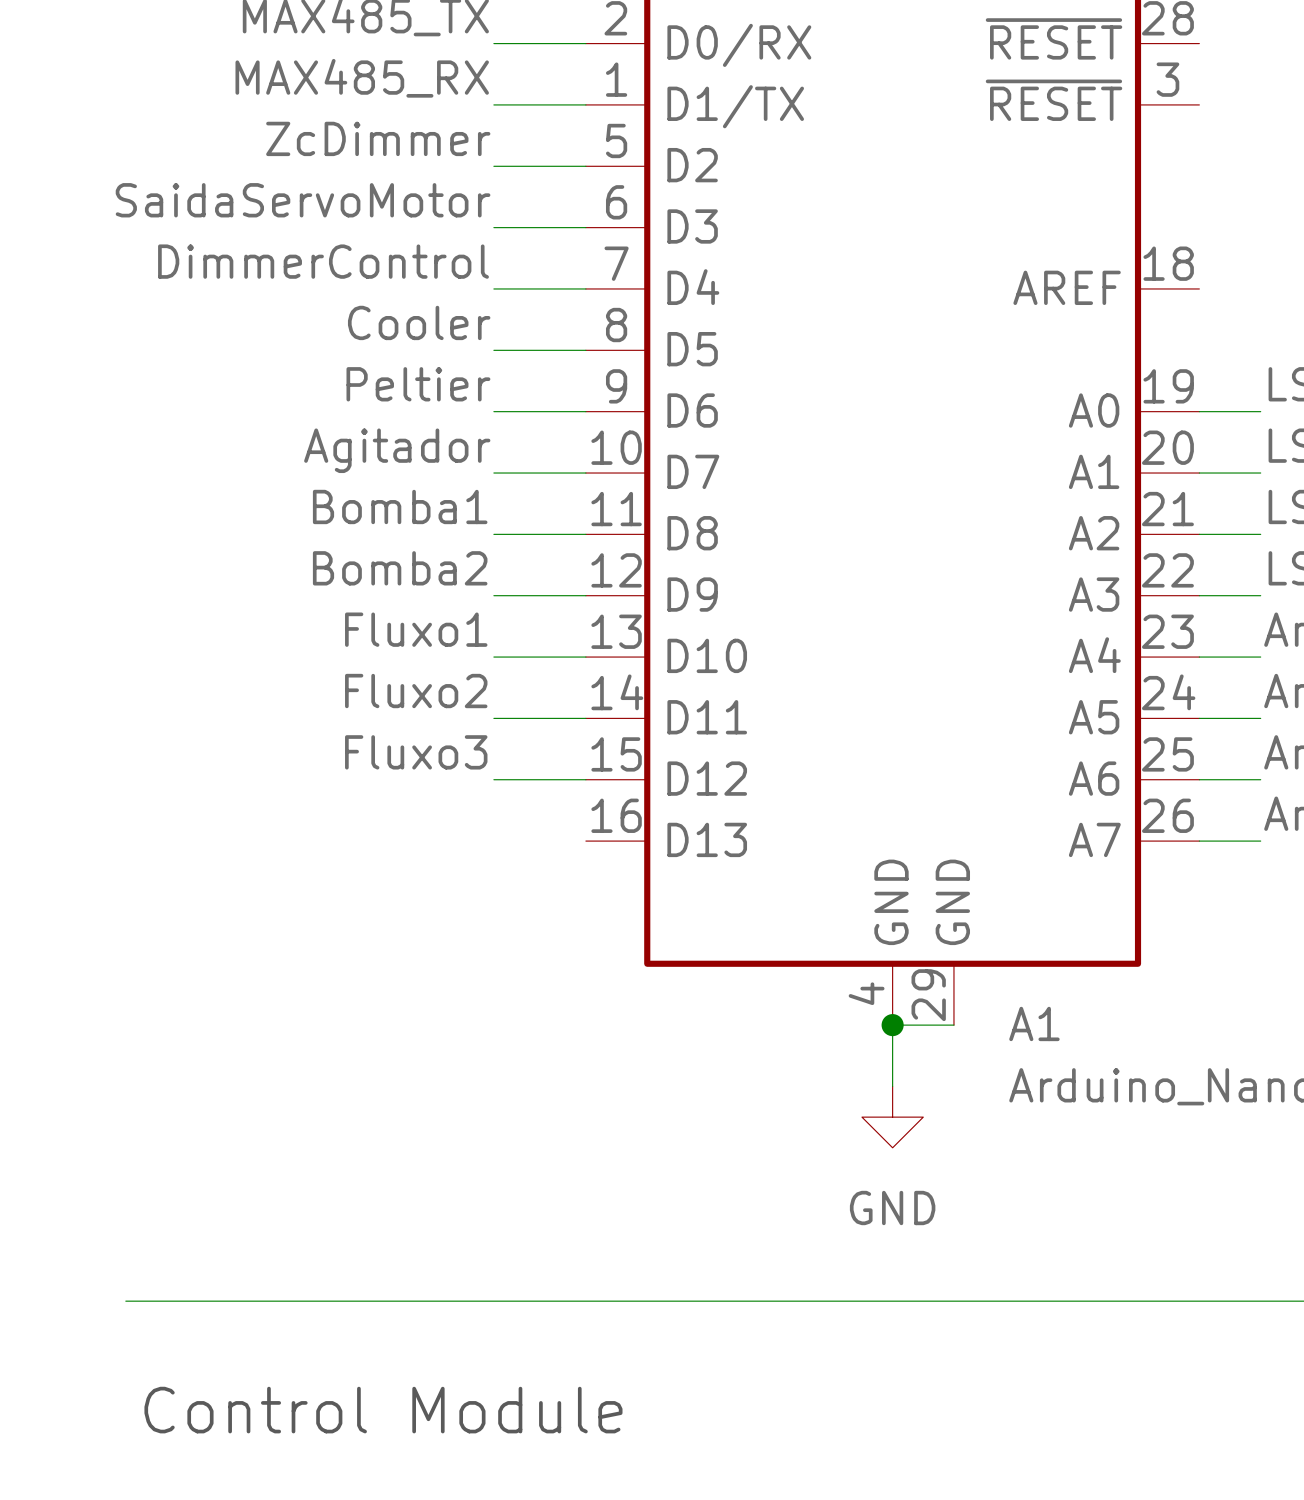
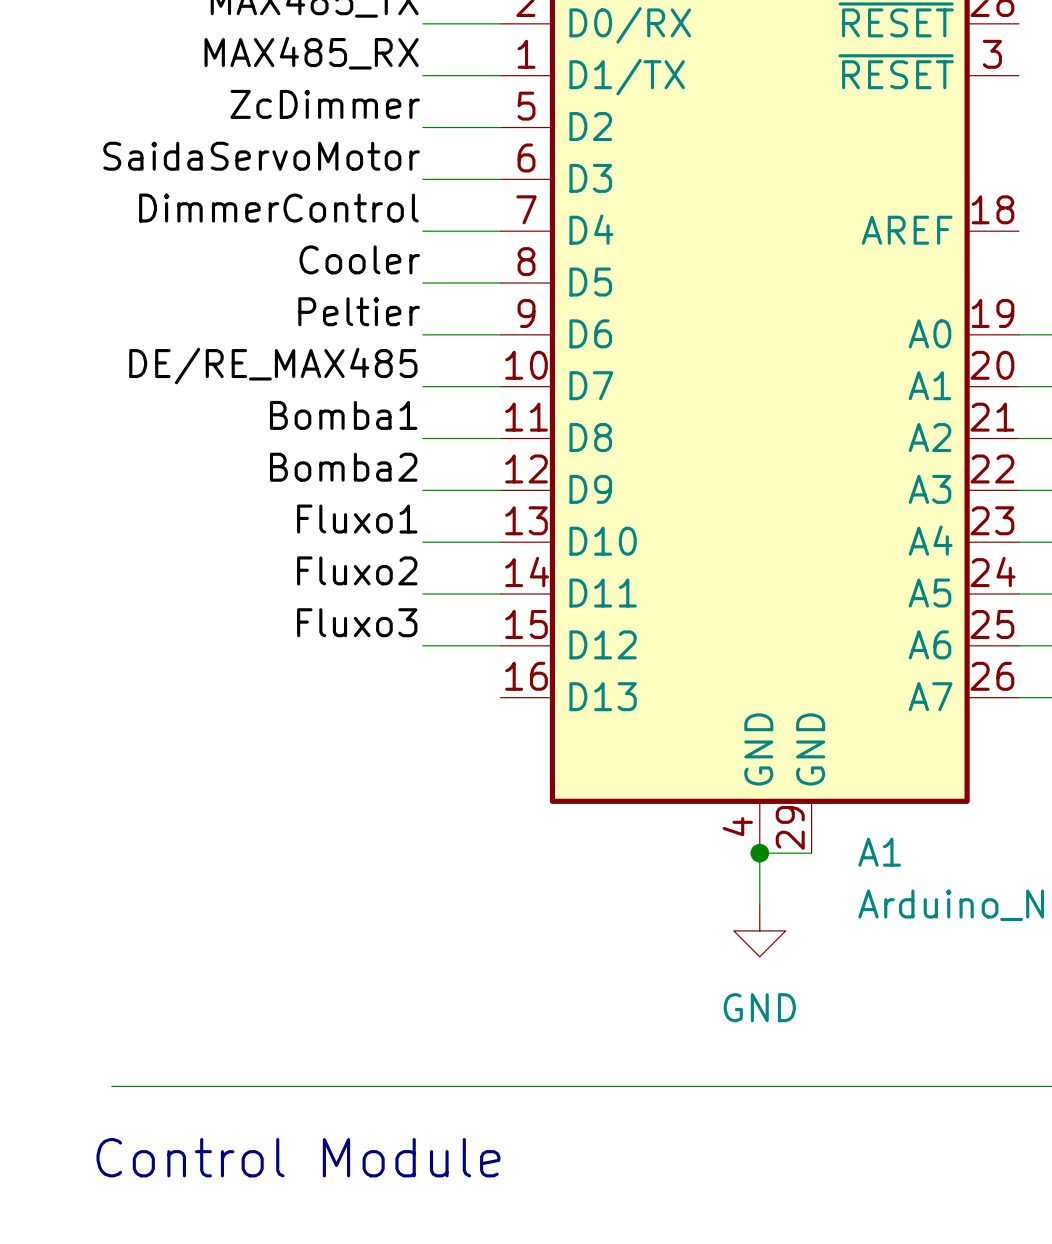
label: Agitador (397, 450) -> DE/RE_MAX485 (273, 366)
text position: Control Module (383, 1410) -> Control Module (298, 1157)

